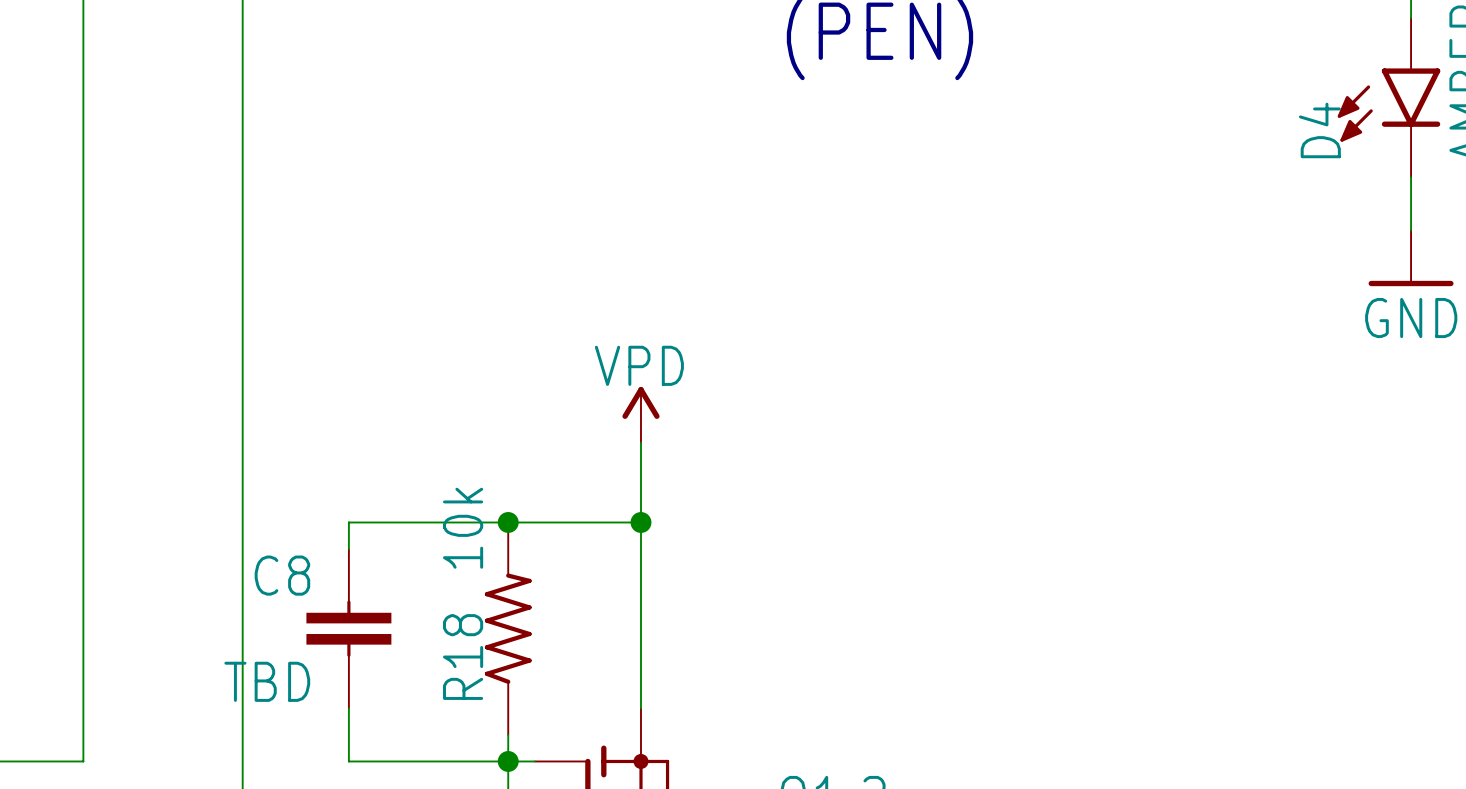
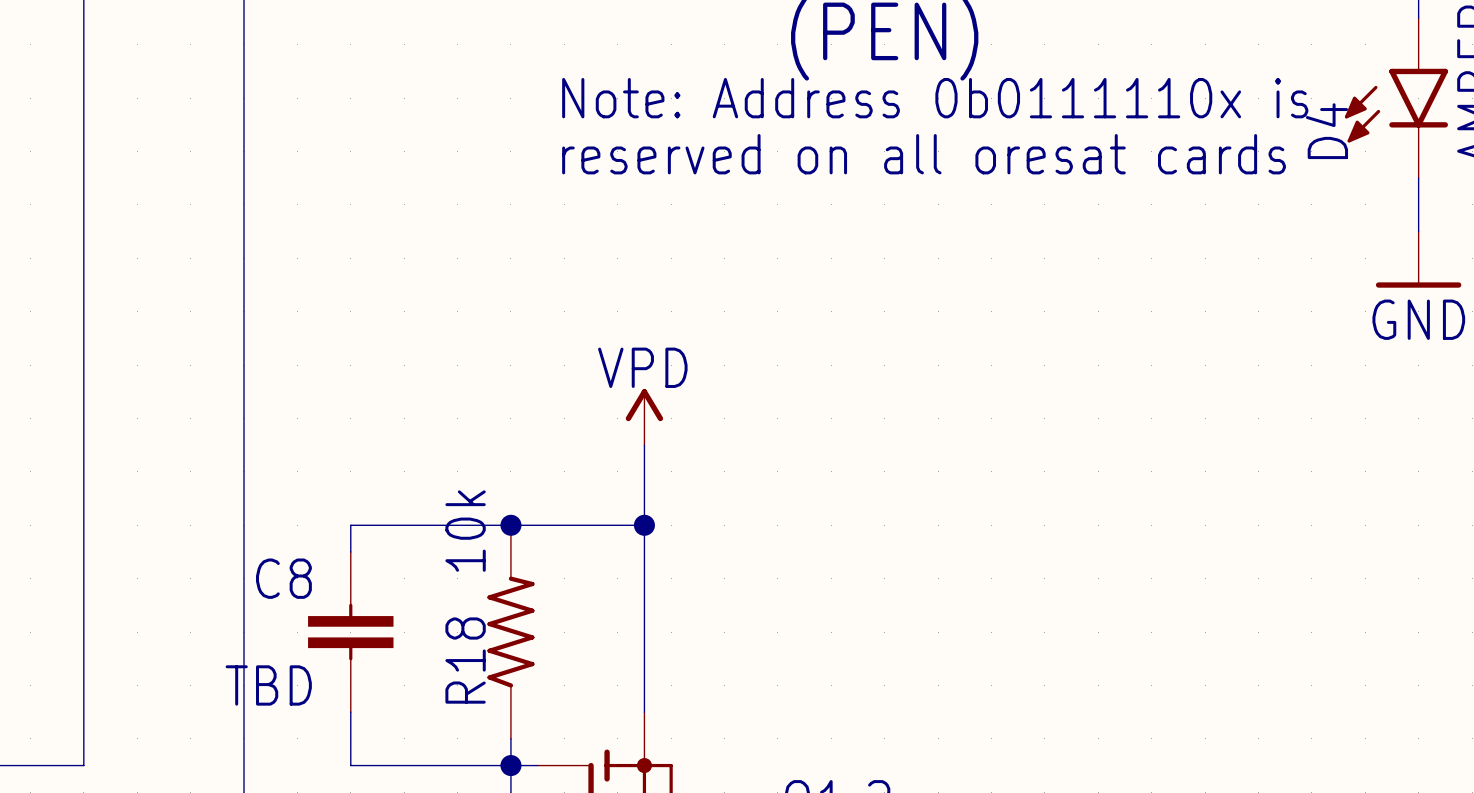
text: none -> Note: Address 0b0111110x is (935, 98)
text: none -> reserved on all oresat cards (924, 154)

